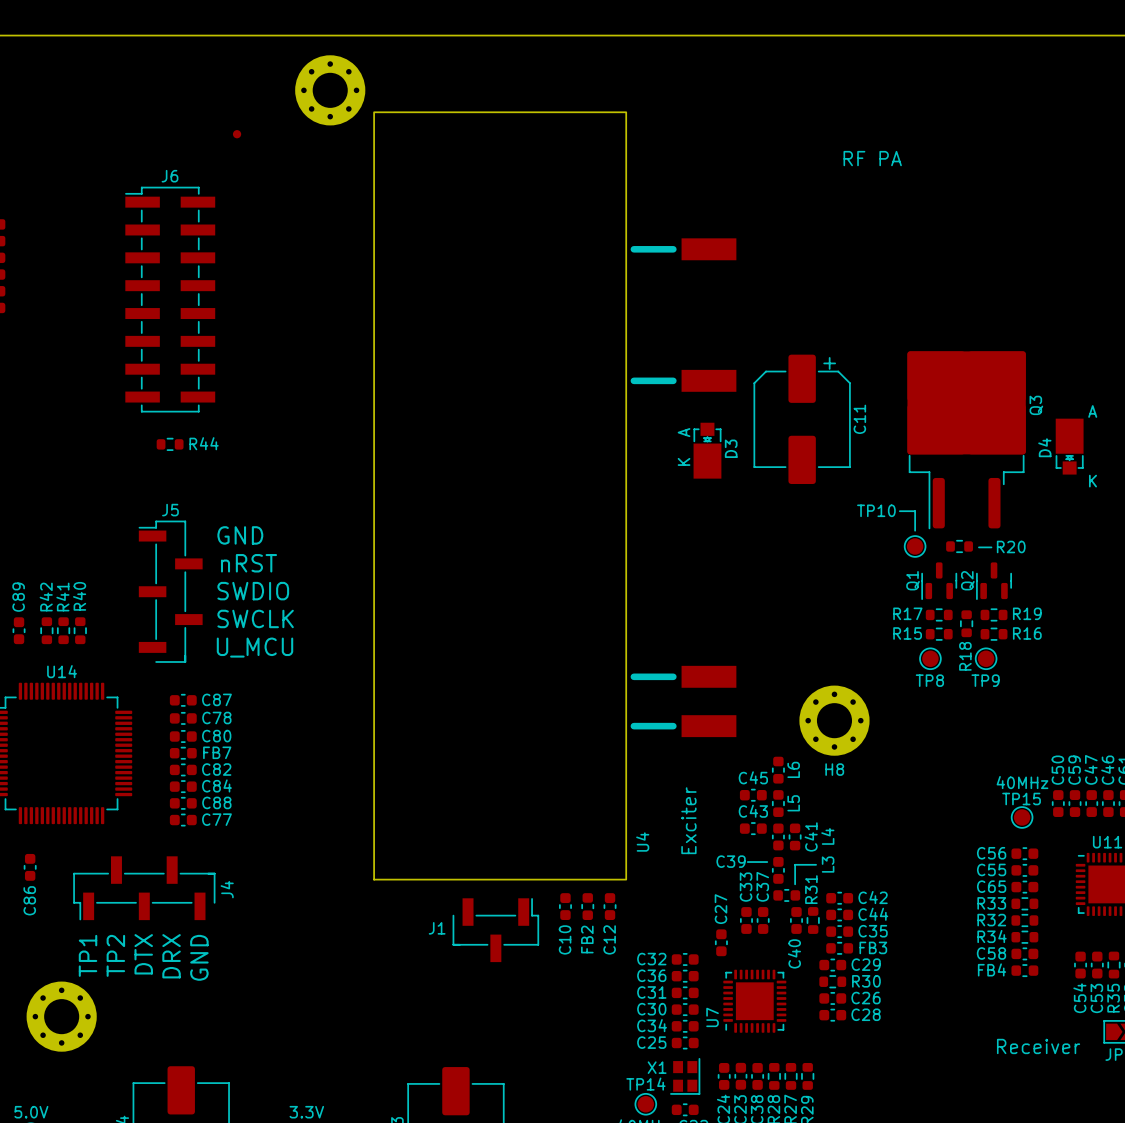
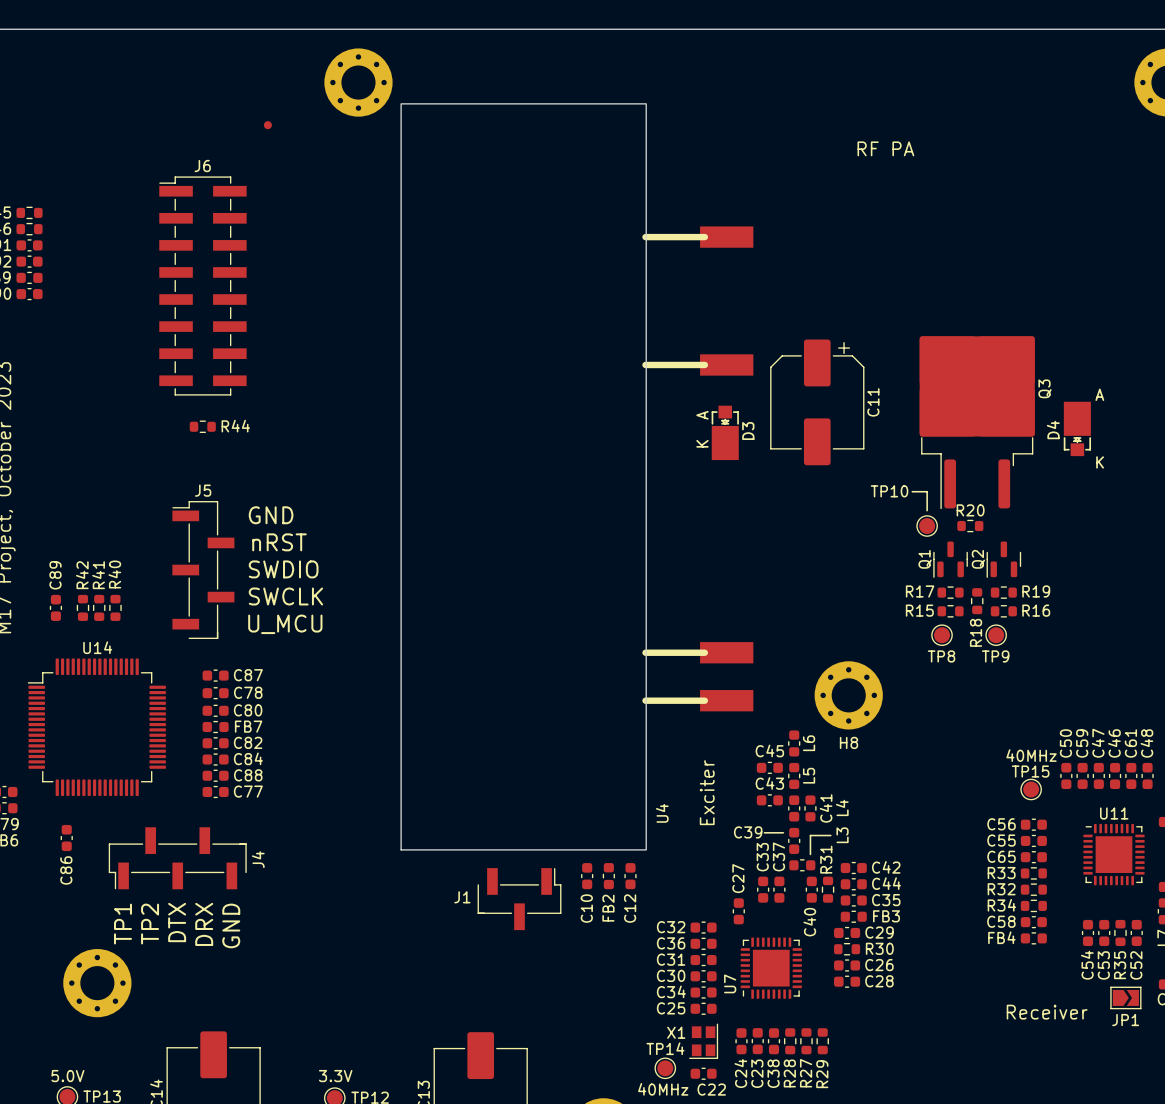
U4 footprint: [373, 111, 737, 881] -> [400, 103, 754, 851]
R20 name position: R20 (1011, 546) -> R20 (970, 510)
line: (978, 547) (991, 547) -> none

